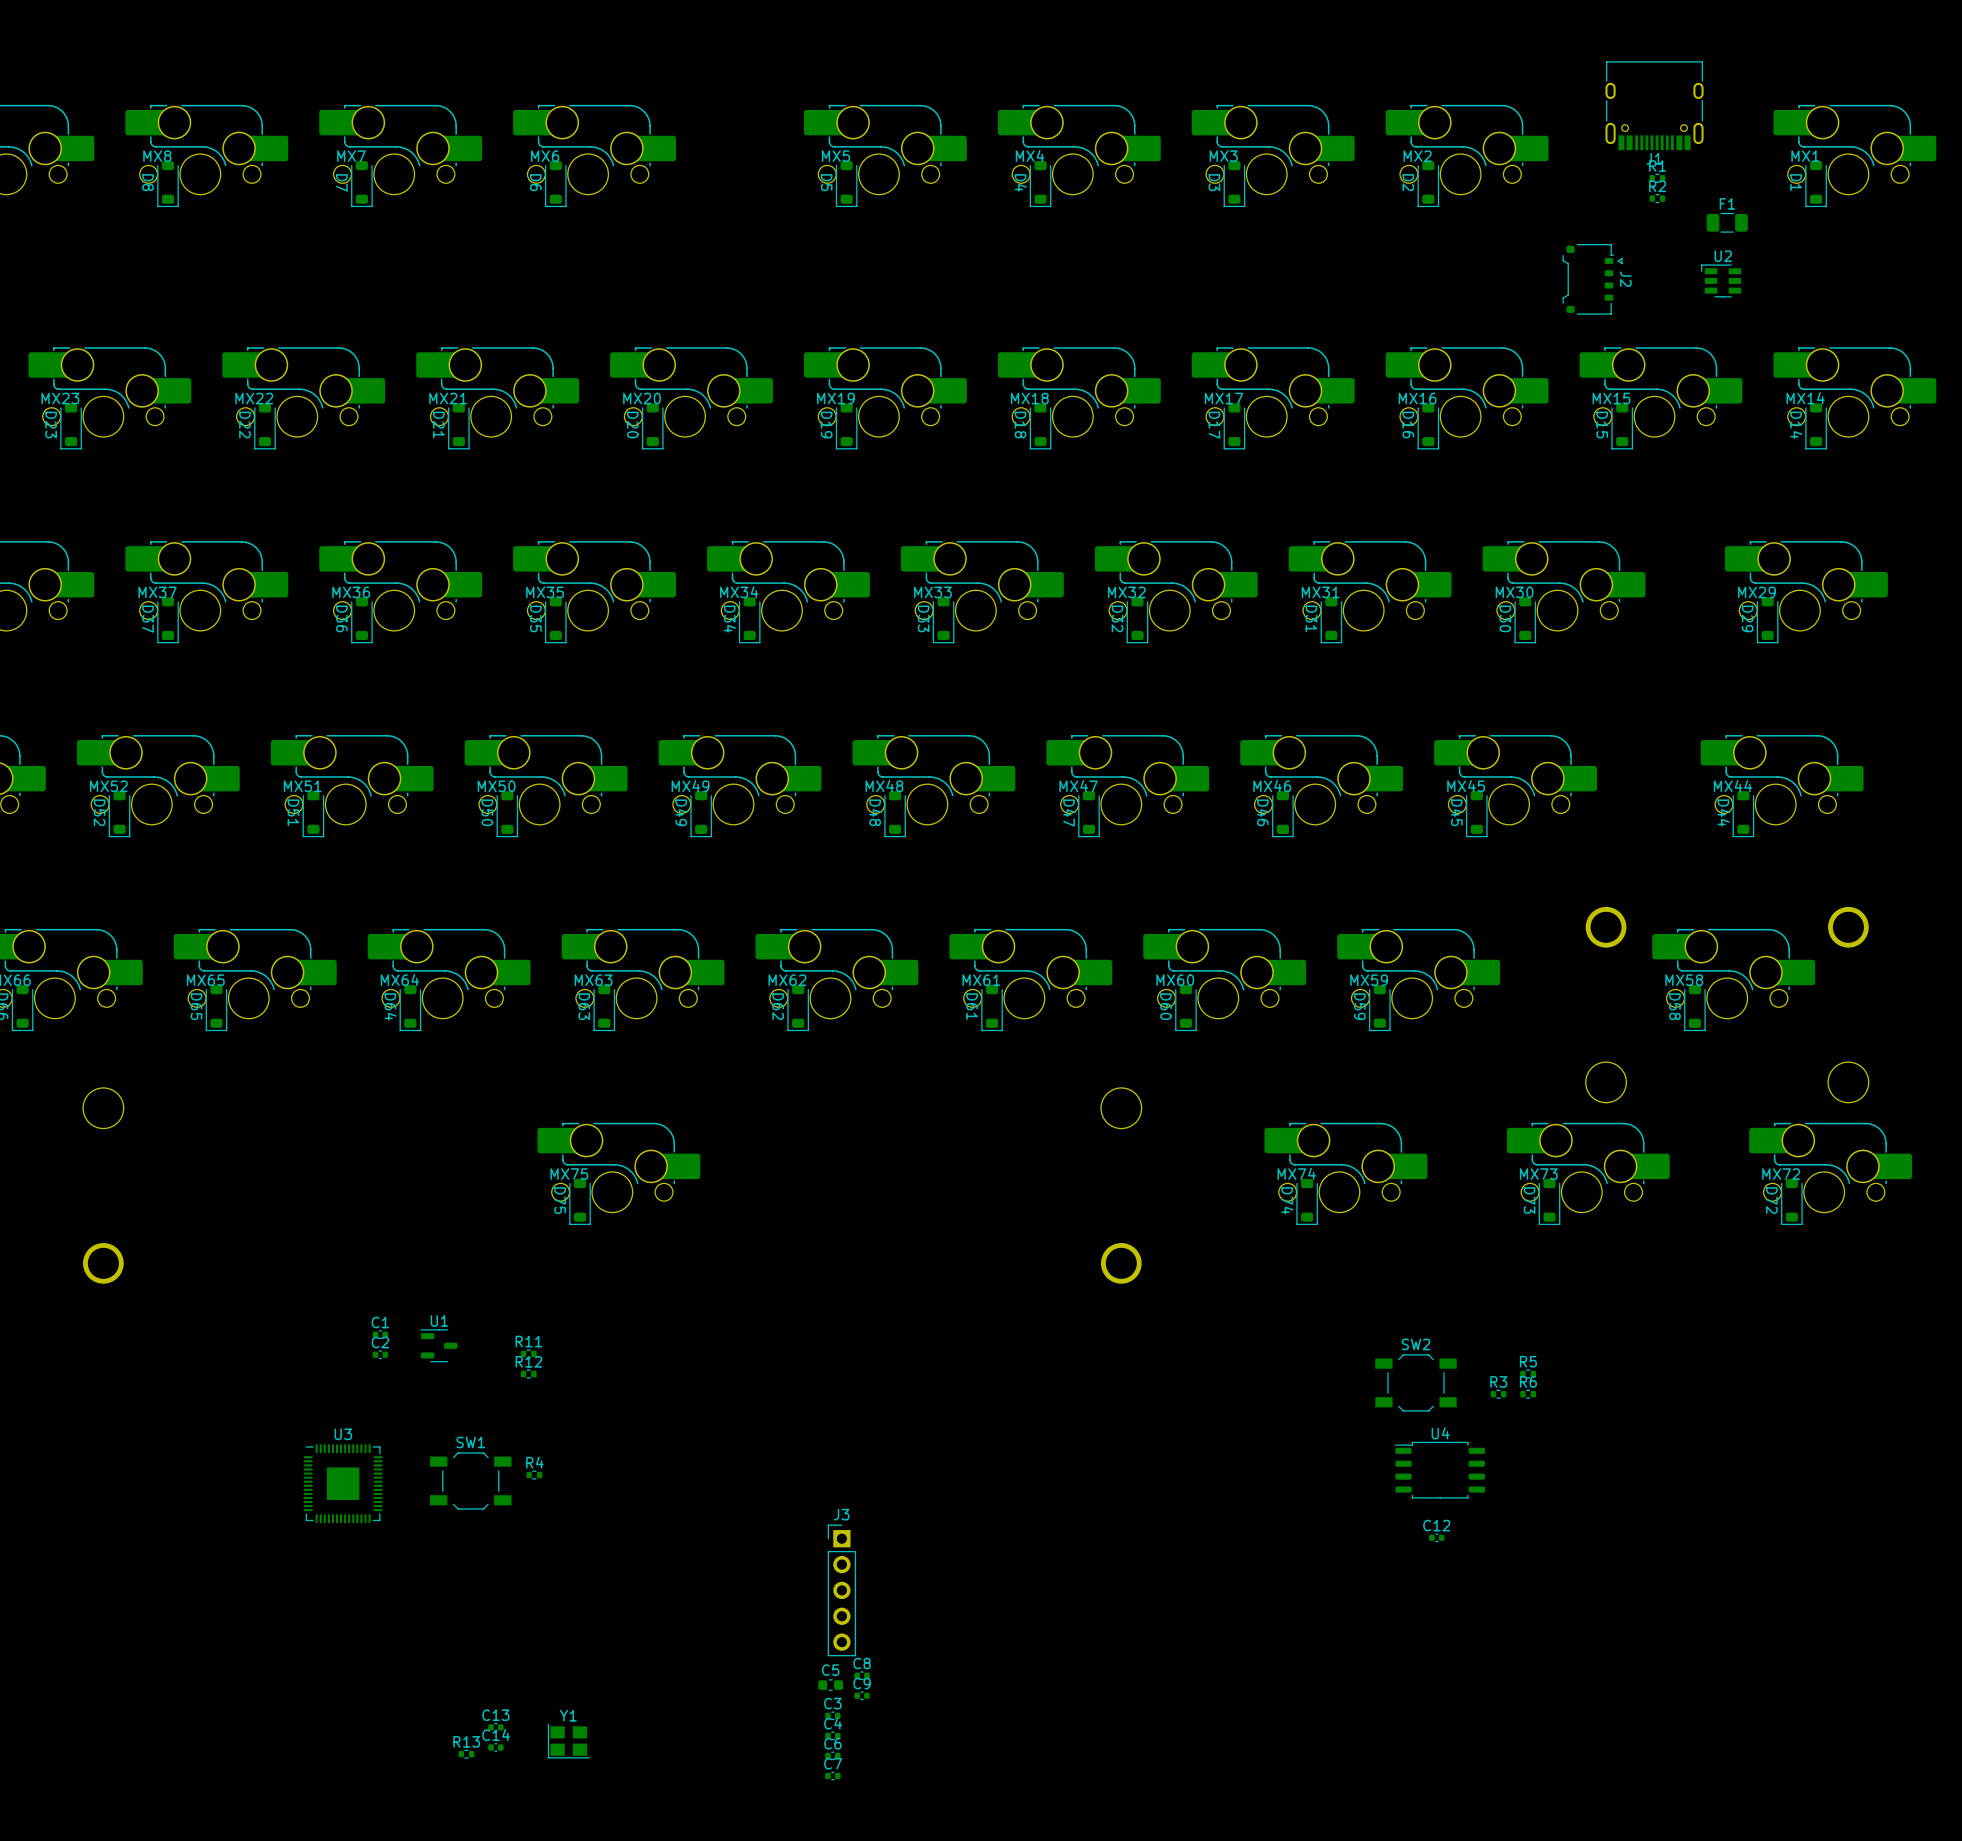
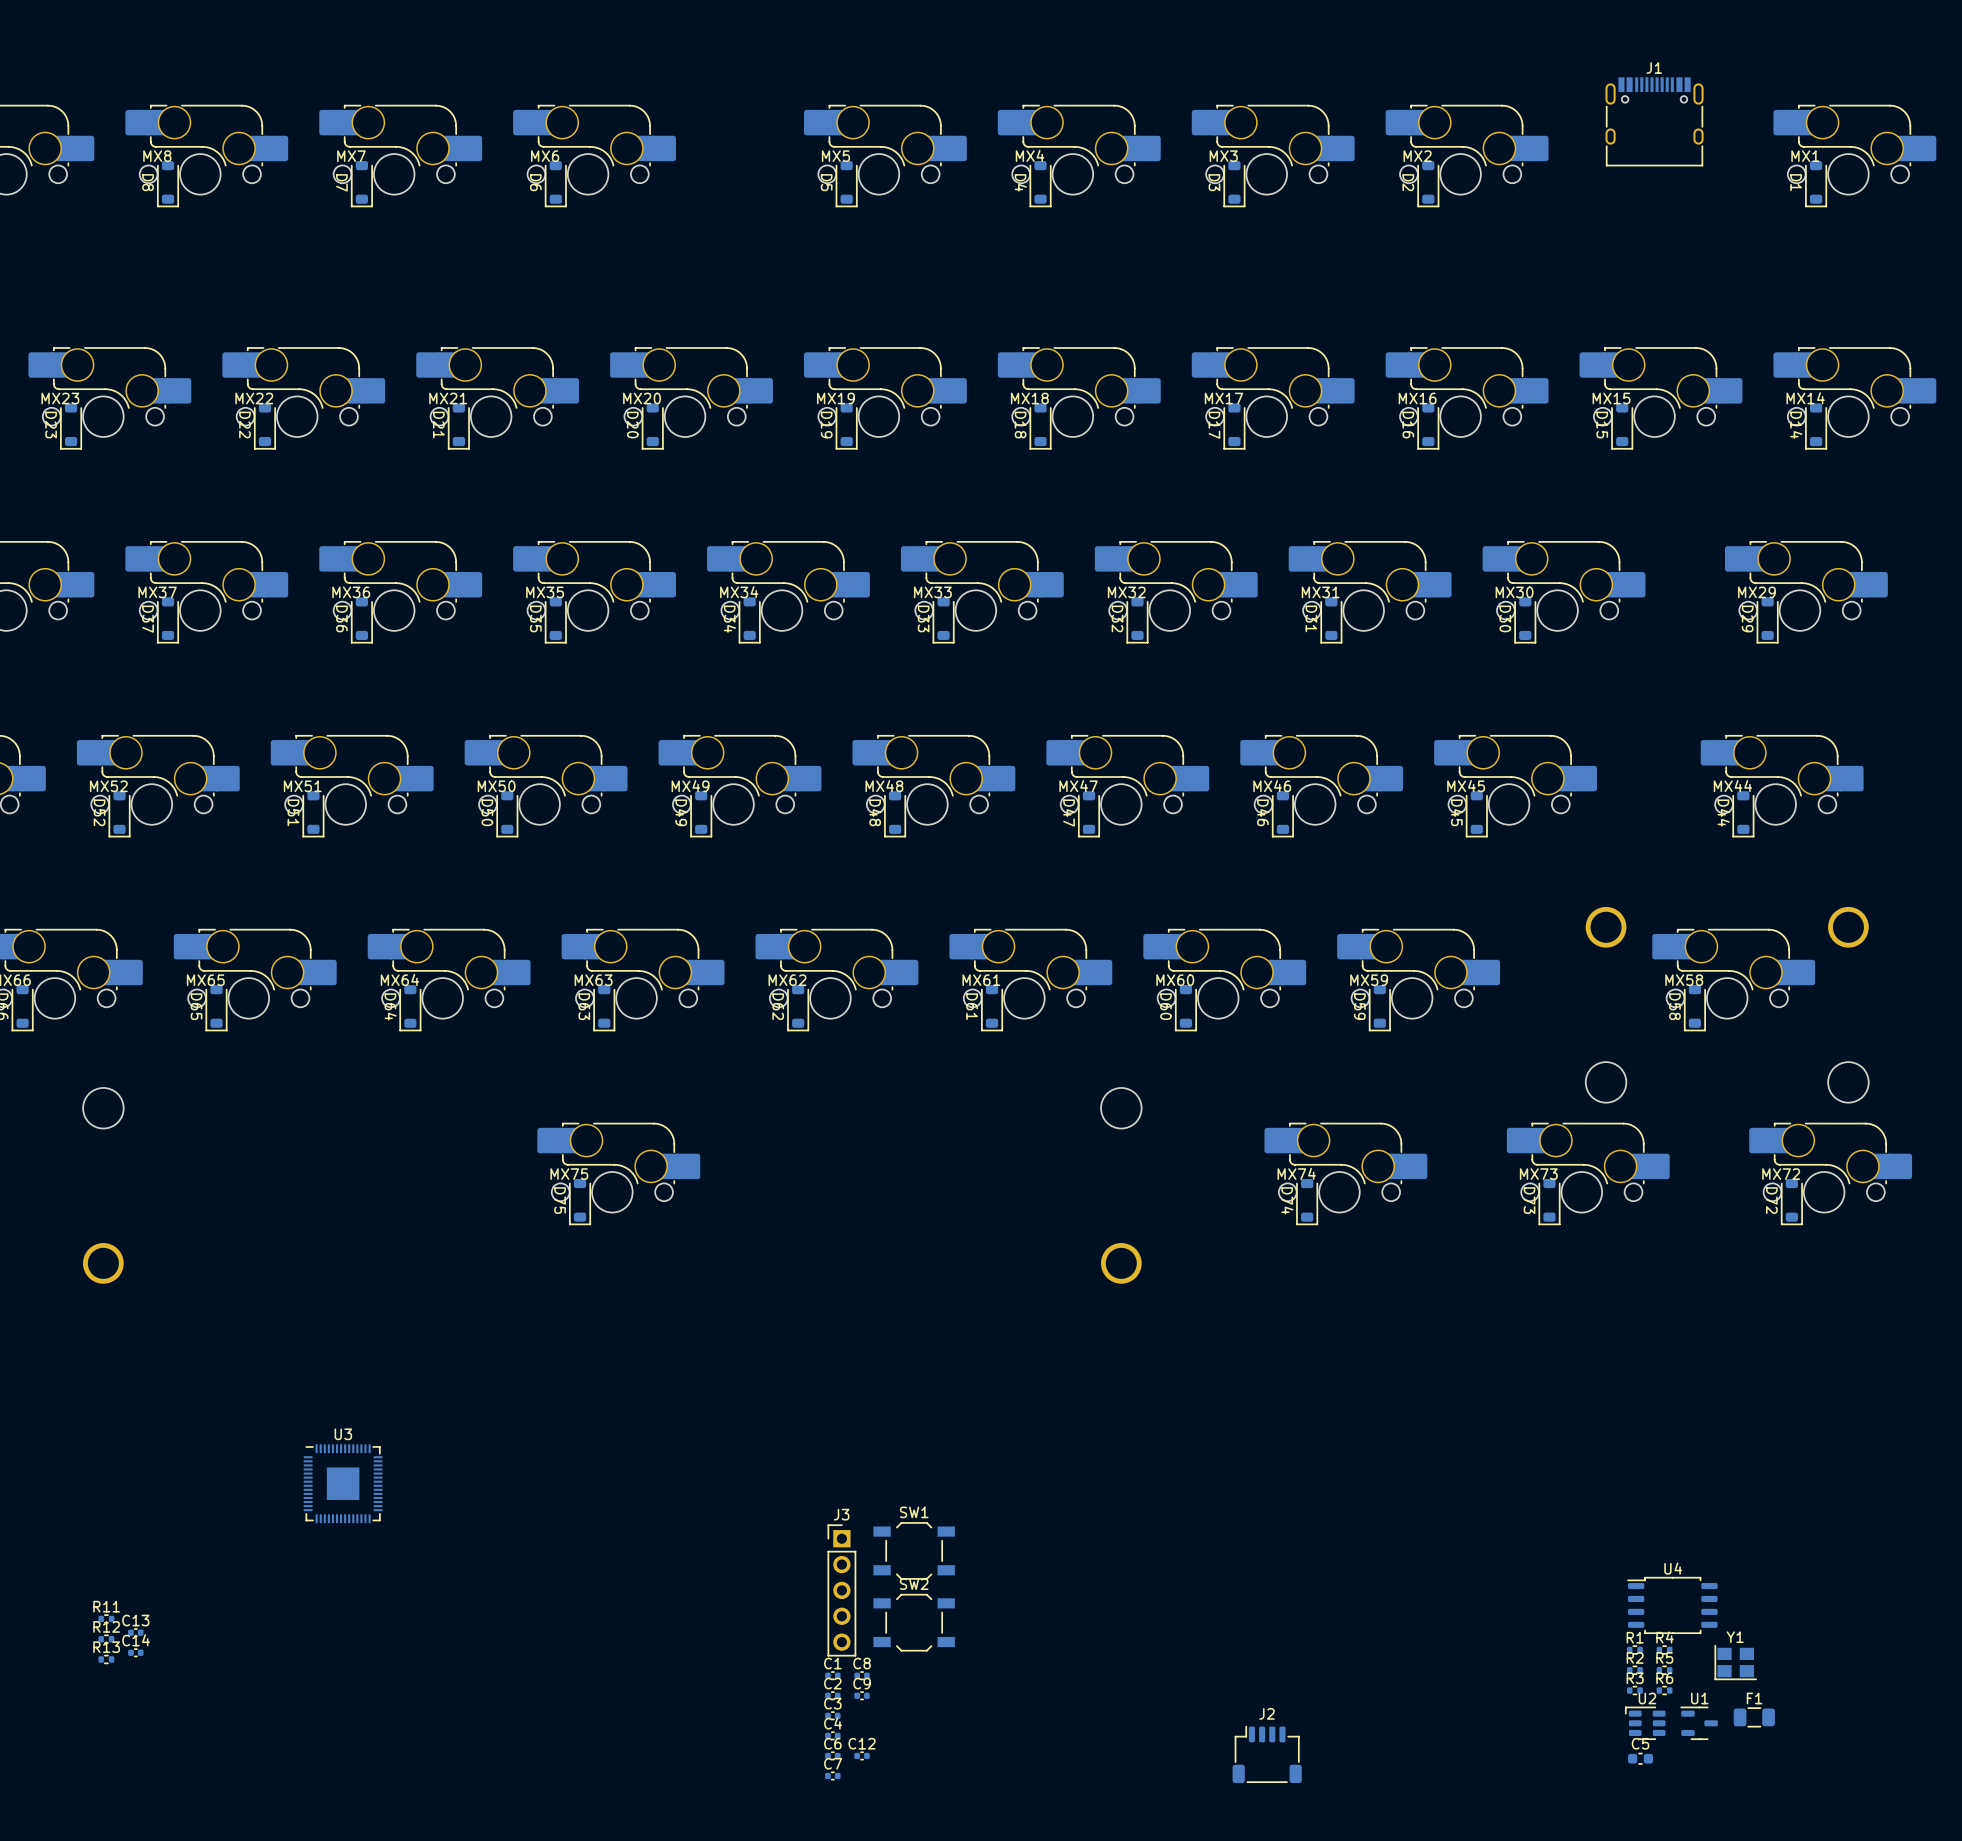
J1 rotation: 0° (1654, 105) -> 180° (1654, 121)
R1 position: (1657, 178) -> (1634, 1650)
R2 position: (1657, 198) -> (1634, 1670)
F1 position: (1727, 222) -> (1754, 1717)
J2 footprint: [1562, 244, 1623, 315] -> [1232, 1725, 1302, 1784]
J2 name position: J2 (1625, 279) -> J2 (1266, 1713)
U2 position: (1721, 280) -> (1645, 1723)
C1 position: (380, 1334) -> (832, 1675)
U1 position: (438, 1345) -> (1699, 1723)
R11 position: (528, 1353) -> (106, 1618)
C2 position: (380, 1354) -> (832, 1695)
R5 position: (1528, 1373) -> (1664, 1670)
R12 position: (528, 1374) -> (106, 1639)
SW2 position: (1416, 1382) -> (914, 1622)
R3 position: (1498, 1394) -> (1634, 1690)
R6 position: (1528, 1394) -> (1664, 1690)
U4 position: (1439, 1470) -> (1672, 1605)
R4 position: (534, 1475) -> (1664, 1650)
SW1 position: (470, 1480) -> (914, 1550)
C12 position: (1436, 1537) -> (862, 1755)
C5 position: (830, 1685) -> (1640, 1758)
C13 position: (495, 1727) -> (135, 1632)
Y1 position: (568, 1741) -> (1735, 1662)
C14 position: (495, 1747) -> (135, 1652)
R13 position: (466, 1754) -> (106, 1659)

